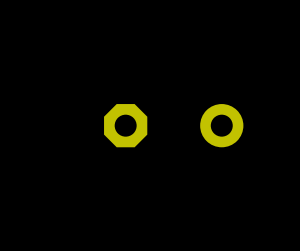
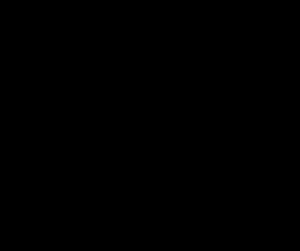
part: (173, 125) -> none

